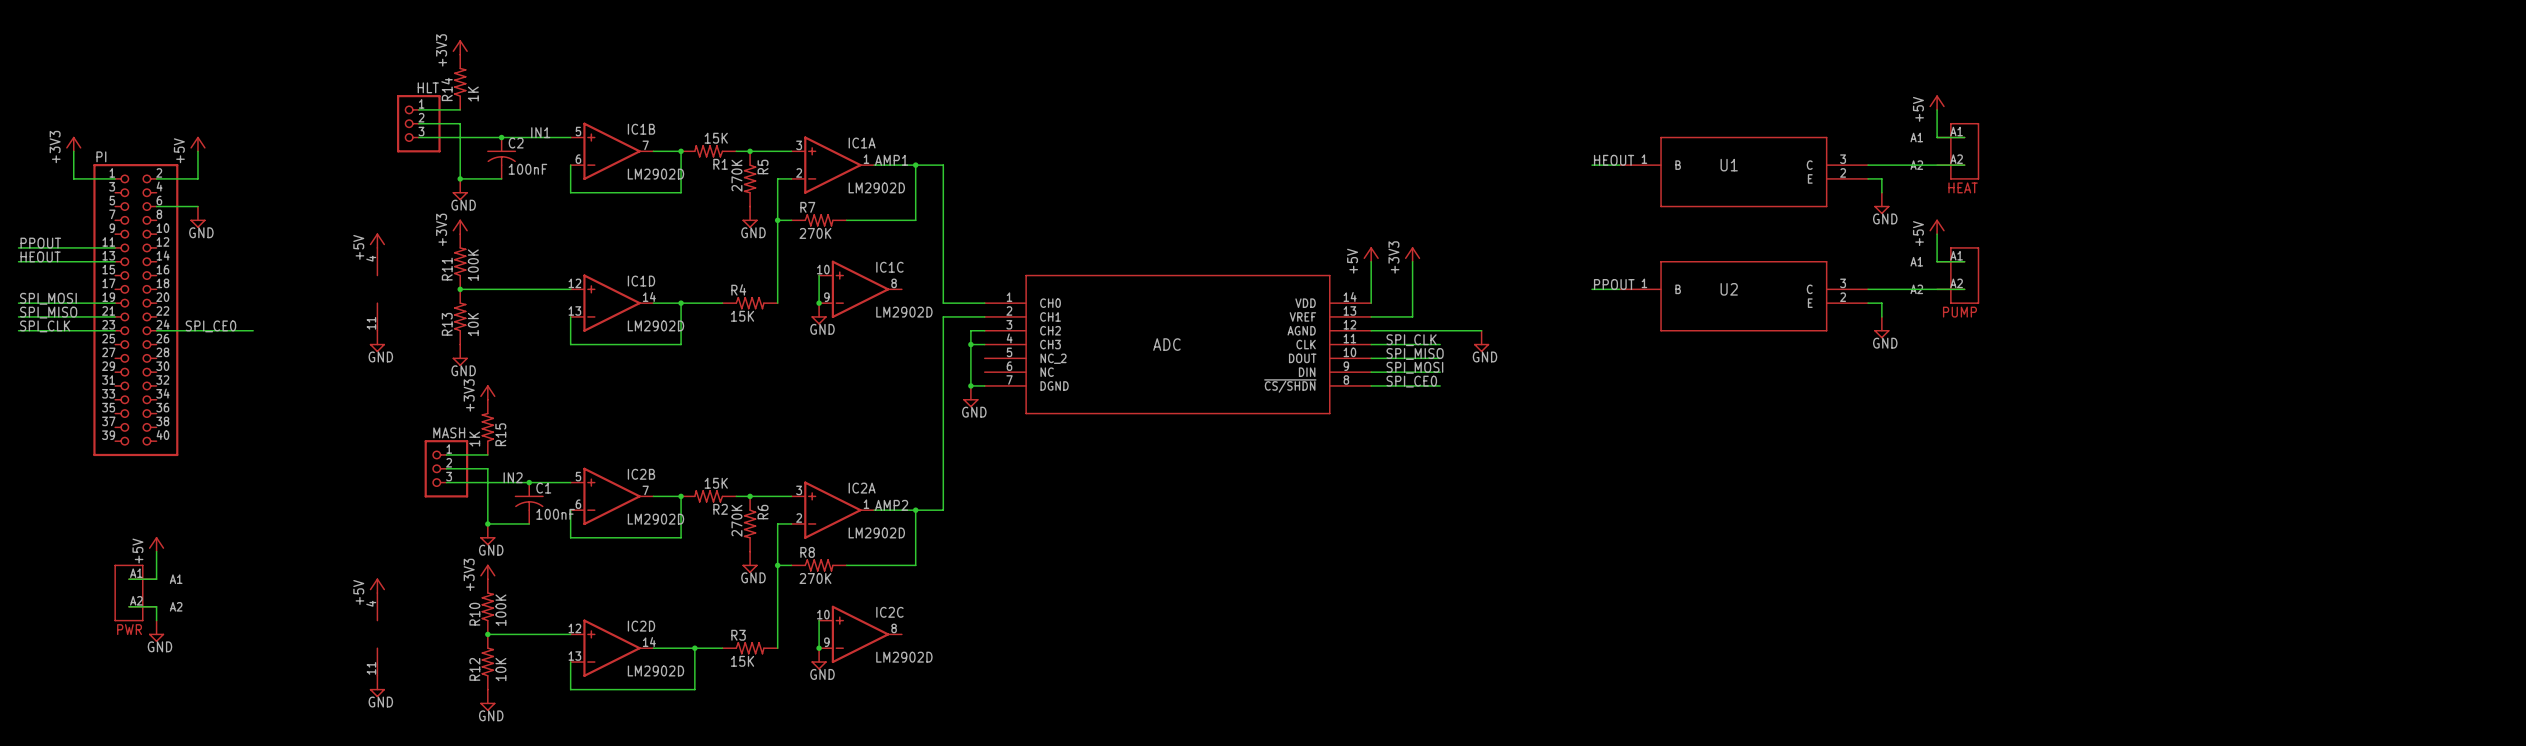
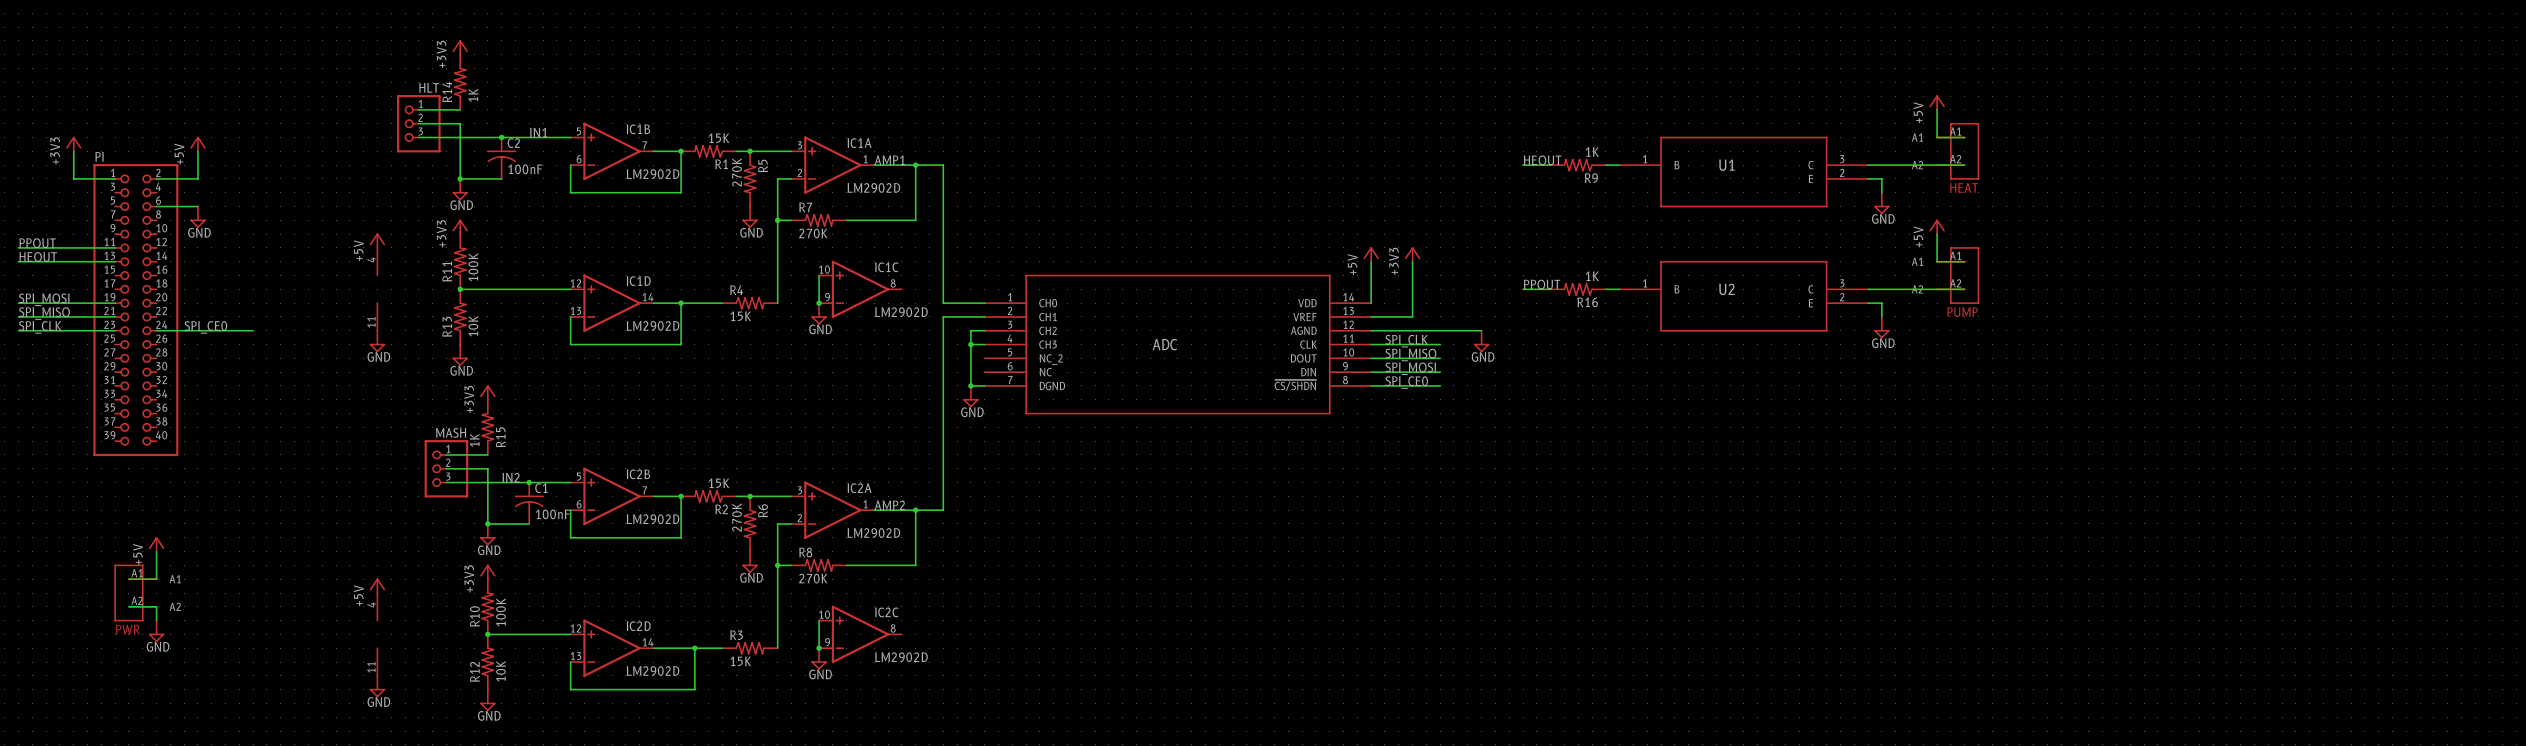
label position: HEOUT (1614, 160) -> HEOUT (1542, 160)
wire: none -> (1523, 165) (1550, 165)
R9: none -> 1K (1578, 165)
label position: PPOUT (1614, 284) -> PPOUT (1542, 284)
wire: none -> (1523, 289) (1550, 289)
R16: none -> 1K (1578, 289)

